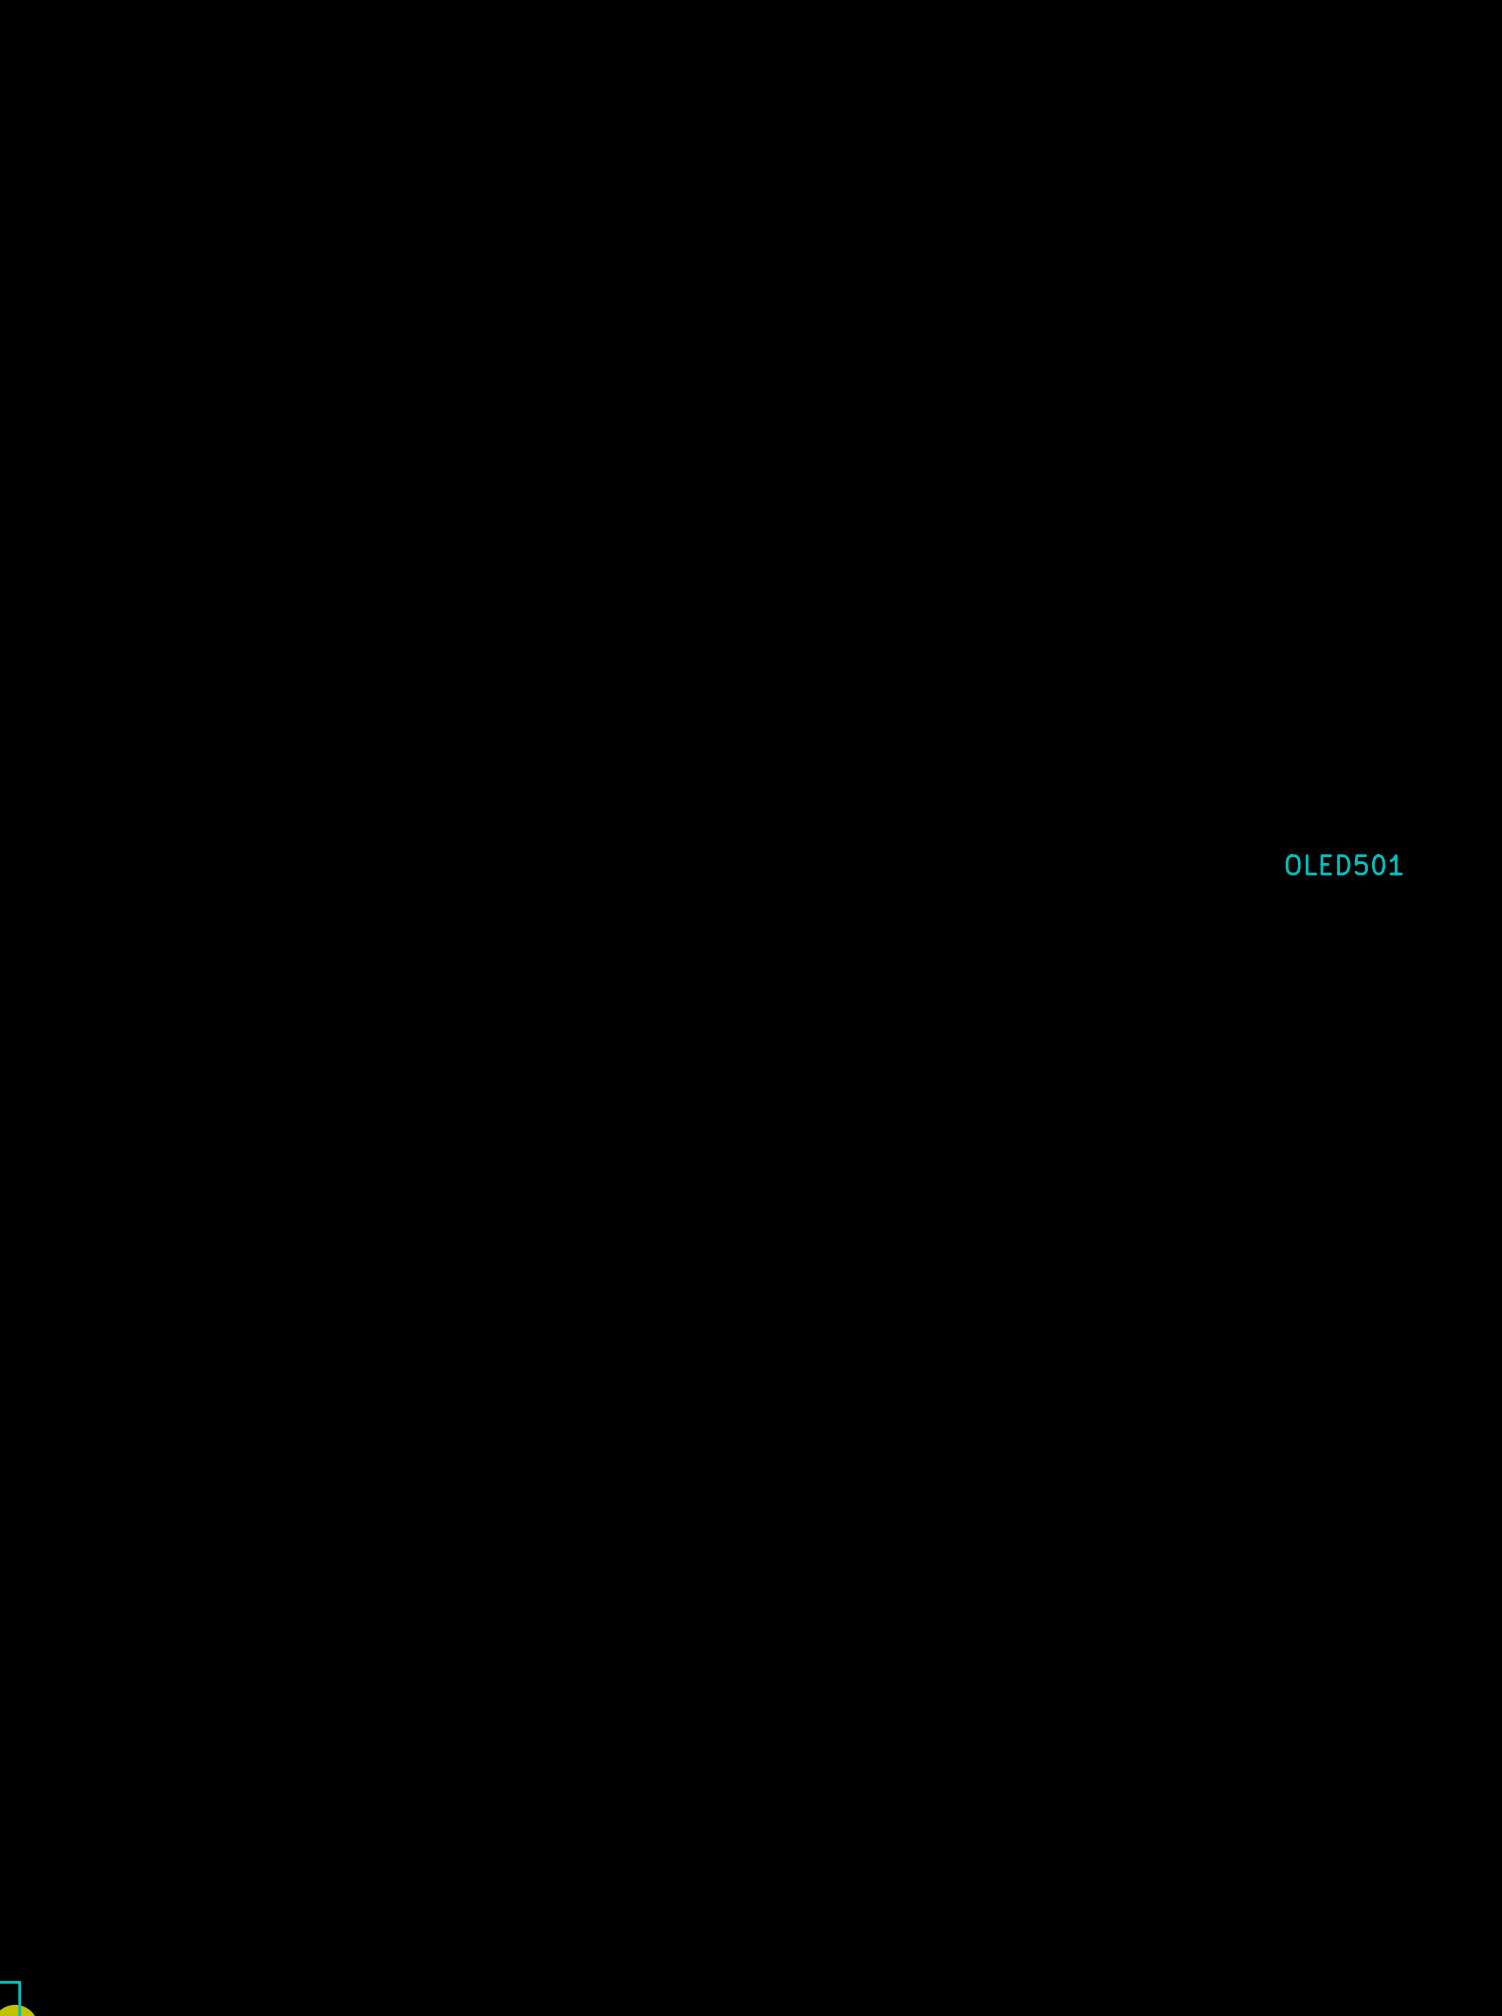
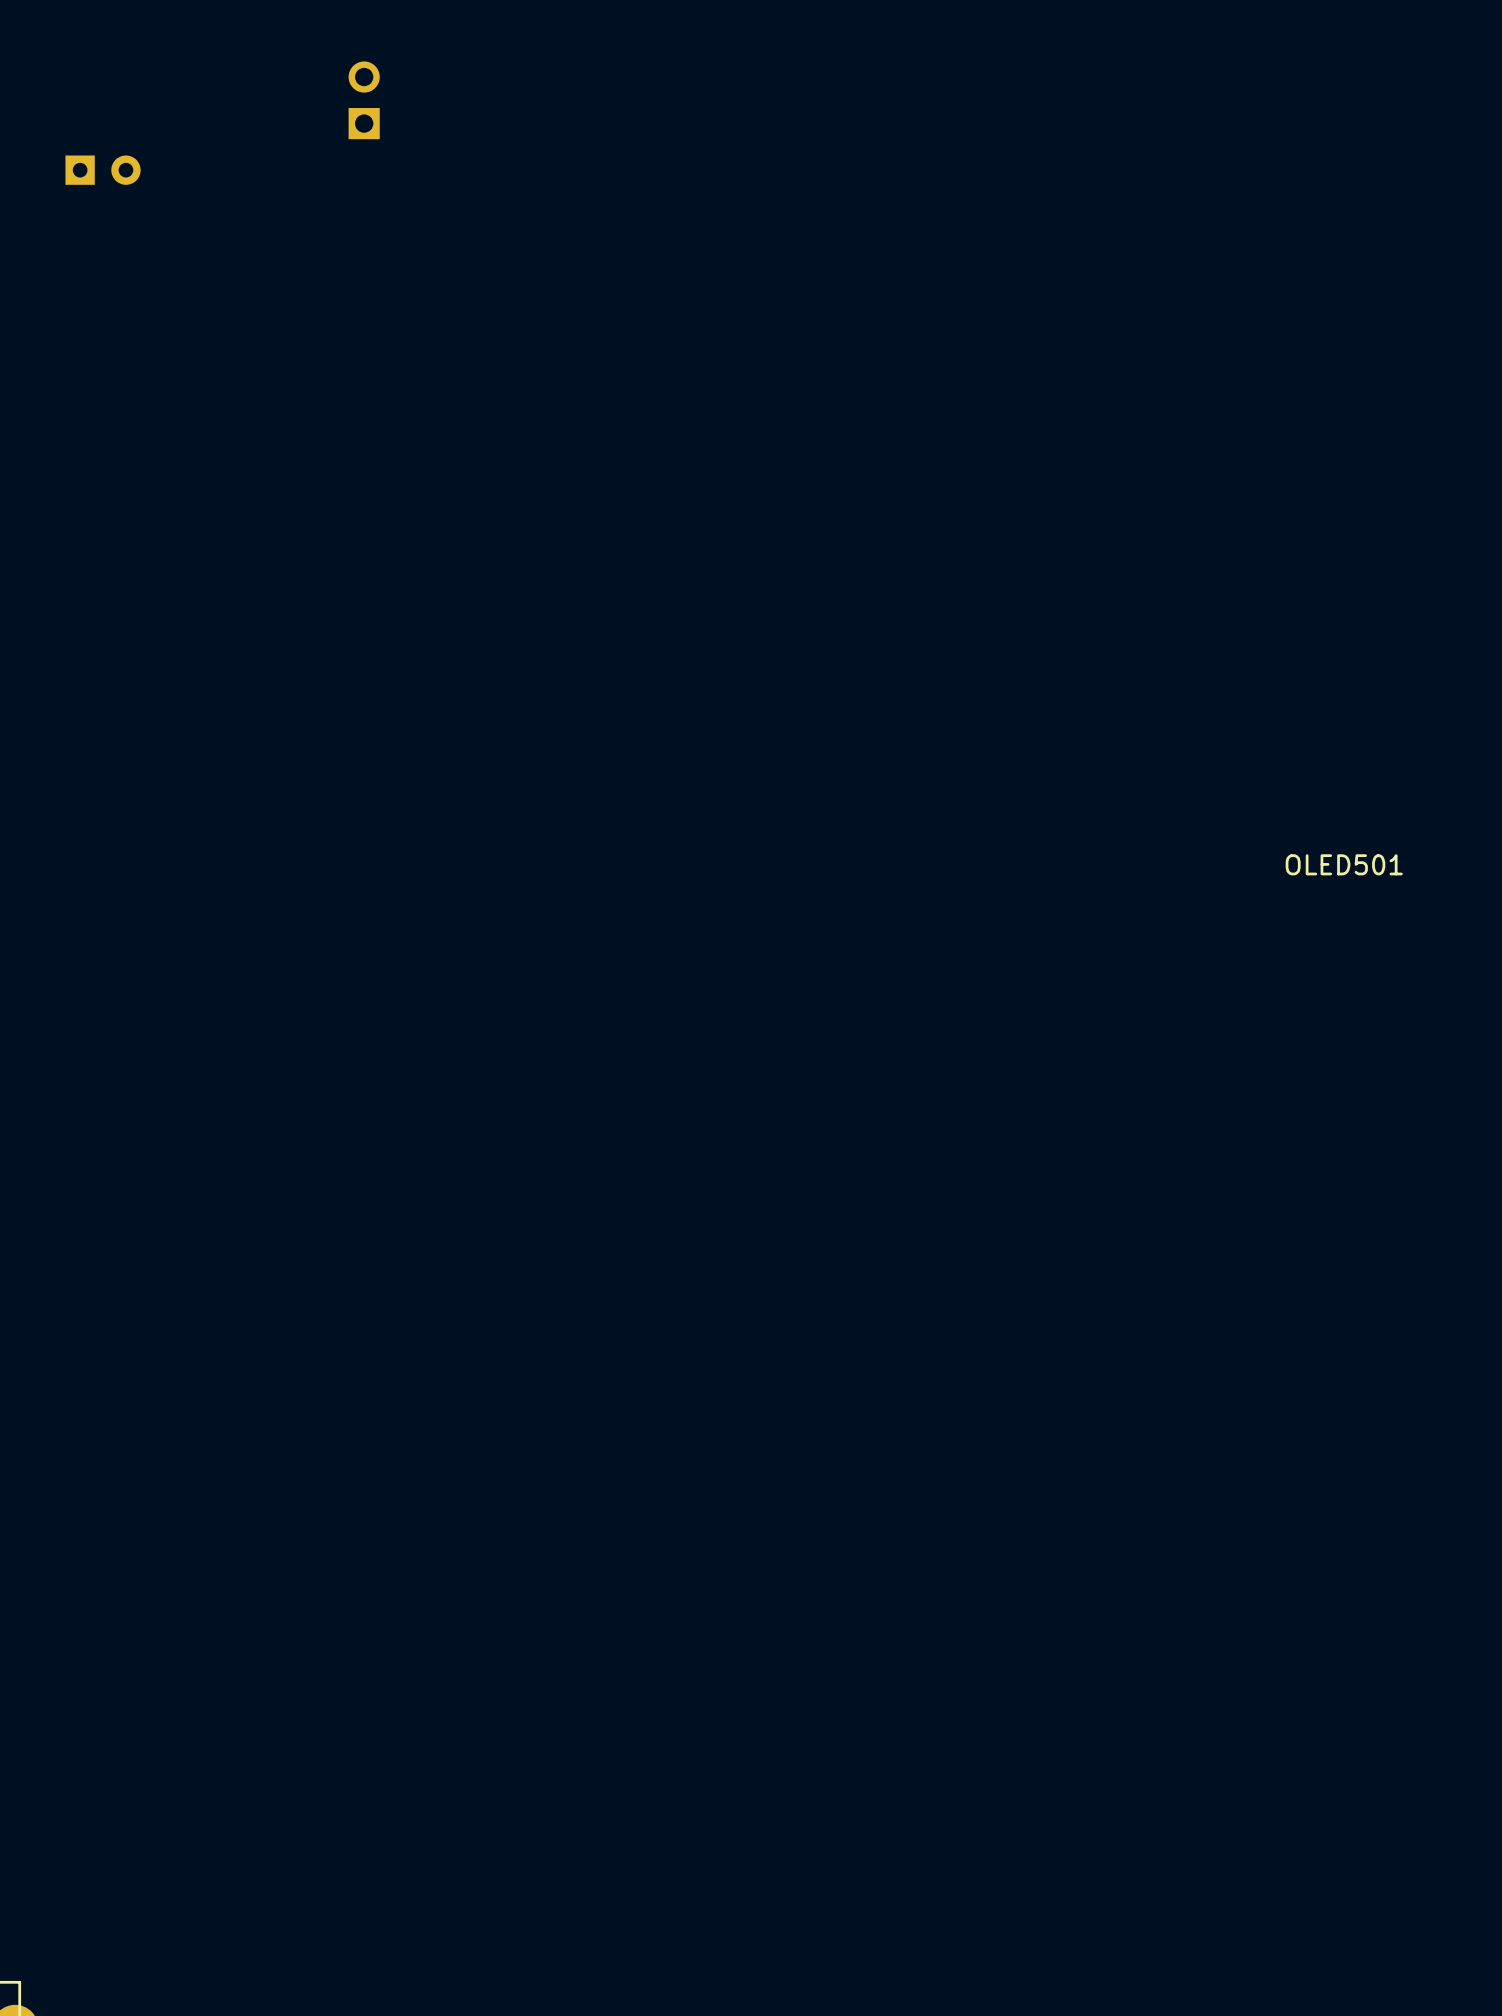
part: none -> (364, 100)
part: none -> (103, 170)

